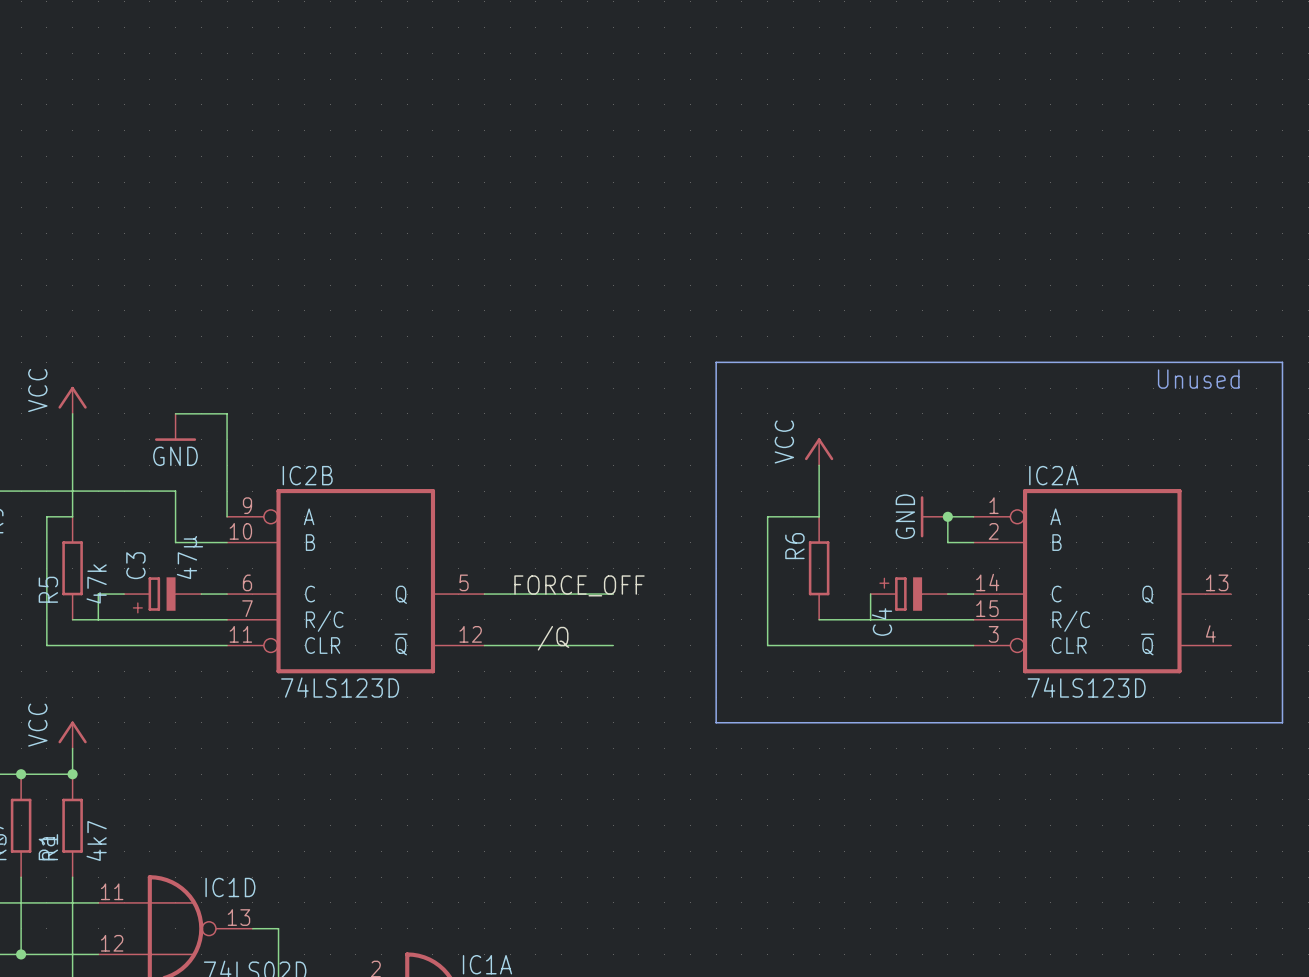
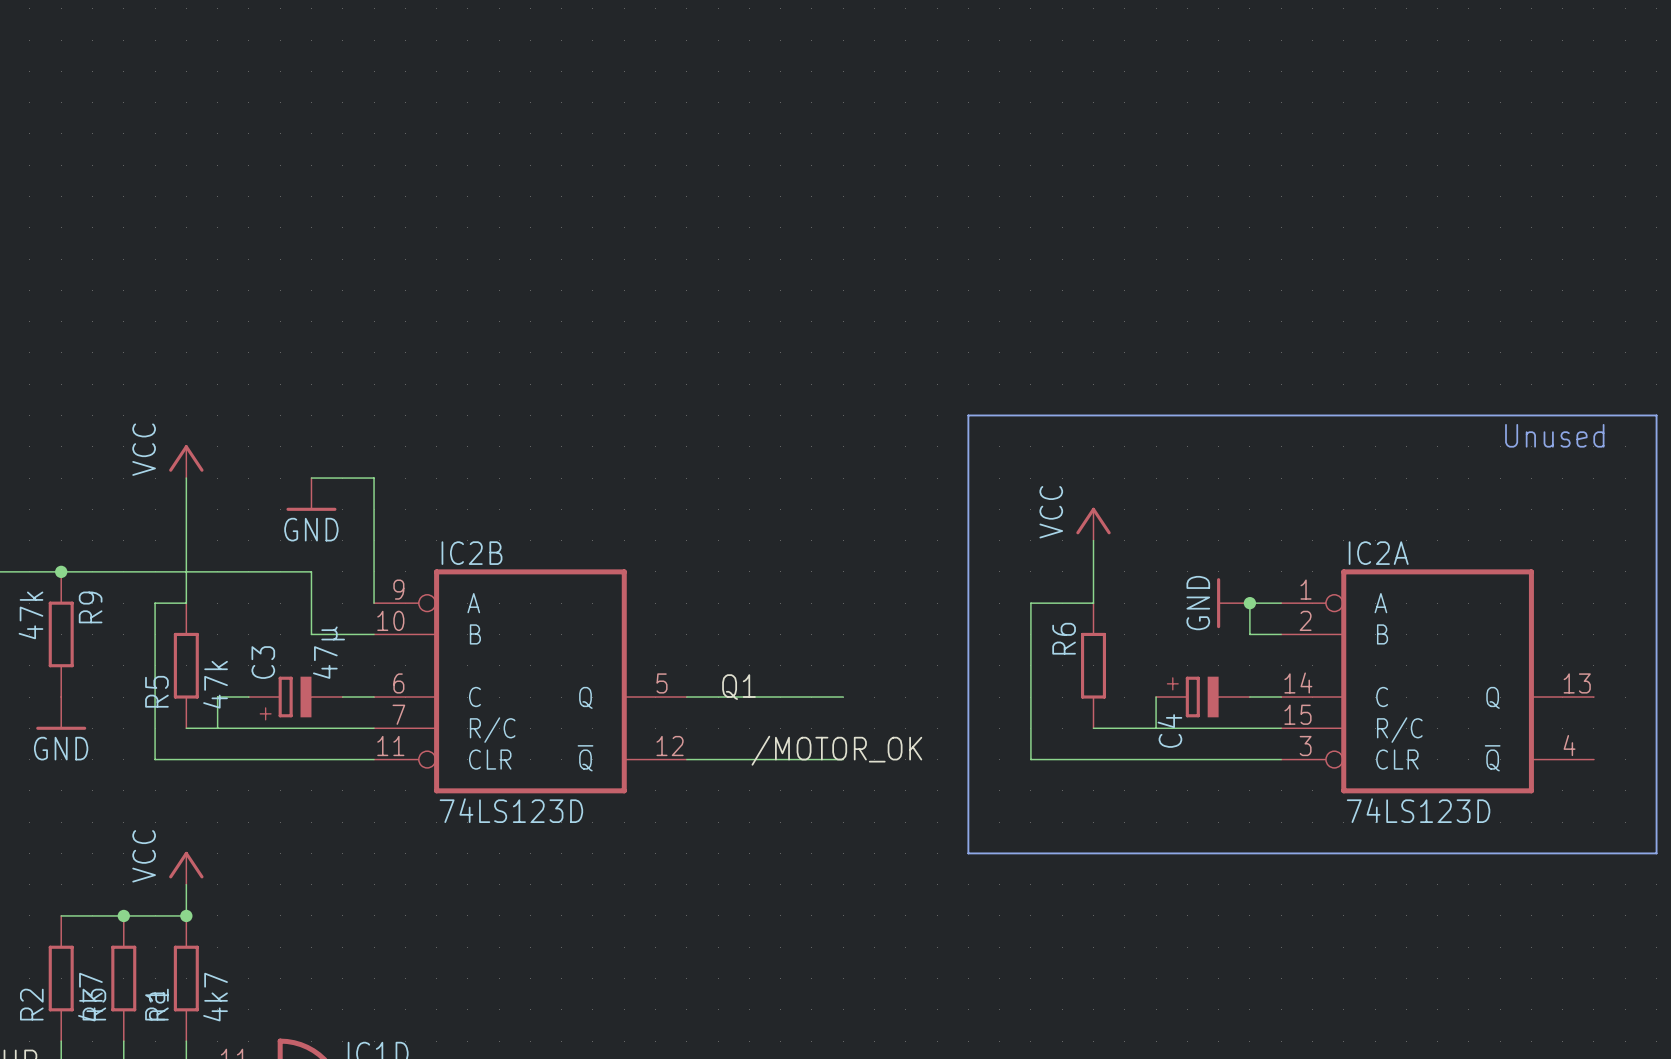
label: FORCE_OFF (579, 585) -> Q1 (738, 687)
label: /Q (553, 638) -> /MOTOR_OK (836, 750)

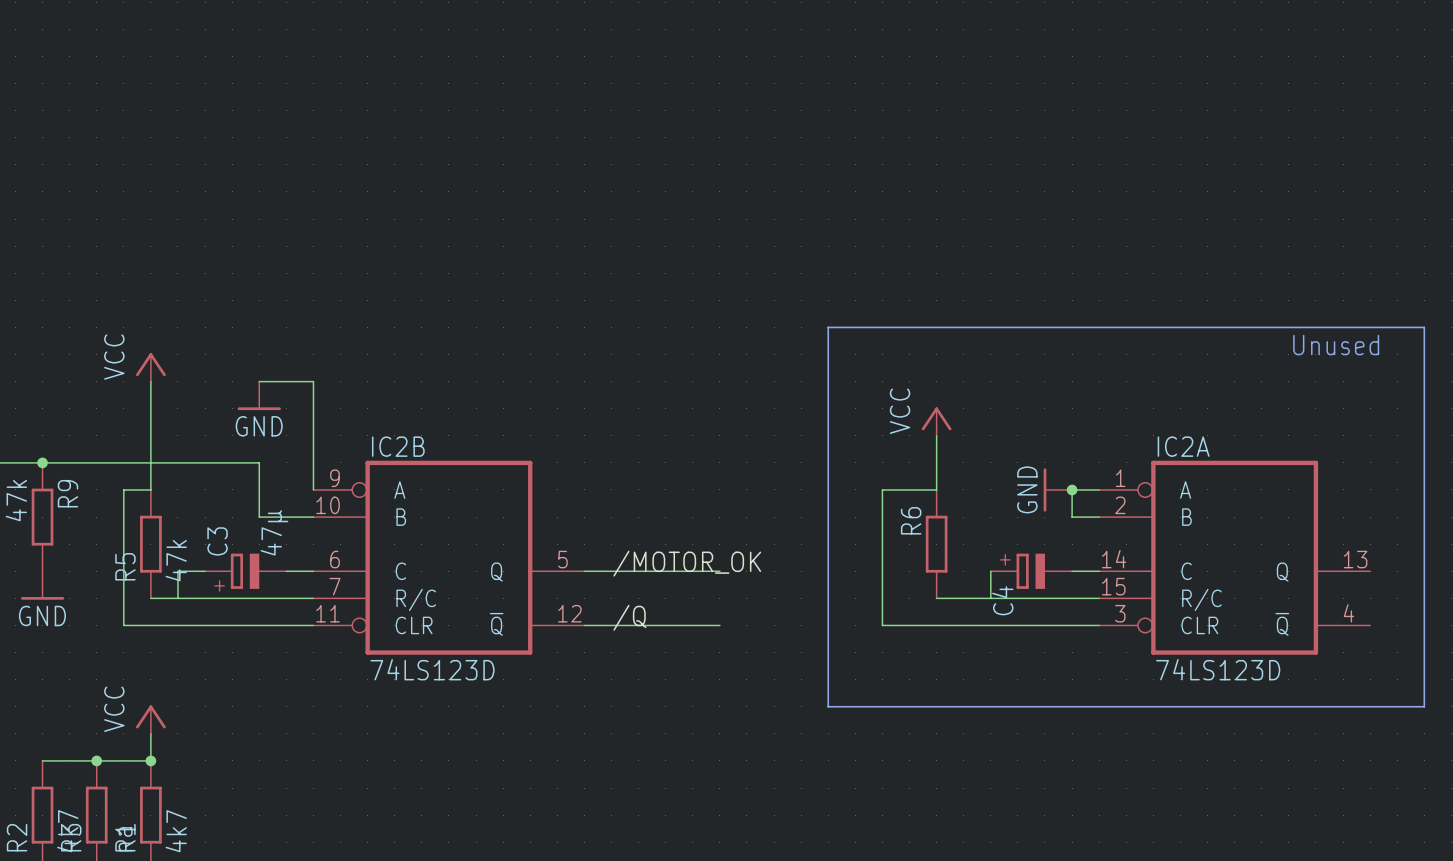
label: Q1 (738, 687) -> /MOTOR_OK (687, 563)
label: none -> /Q (629, 617)
label: /MOTOR_OK (836, 750) -> none

